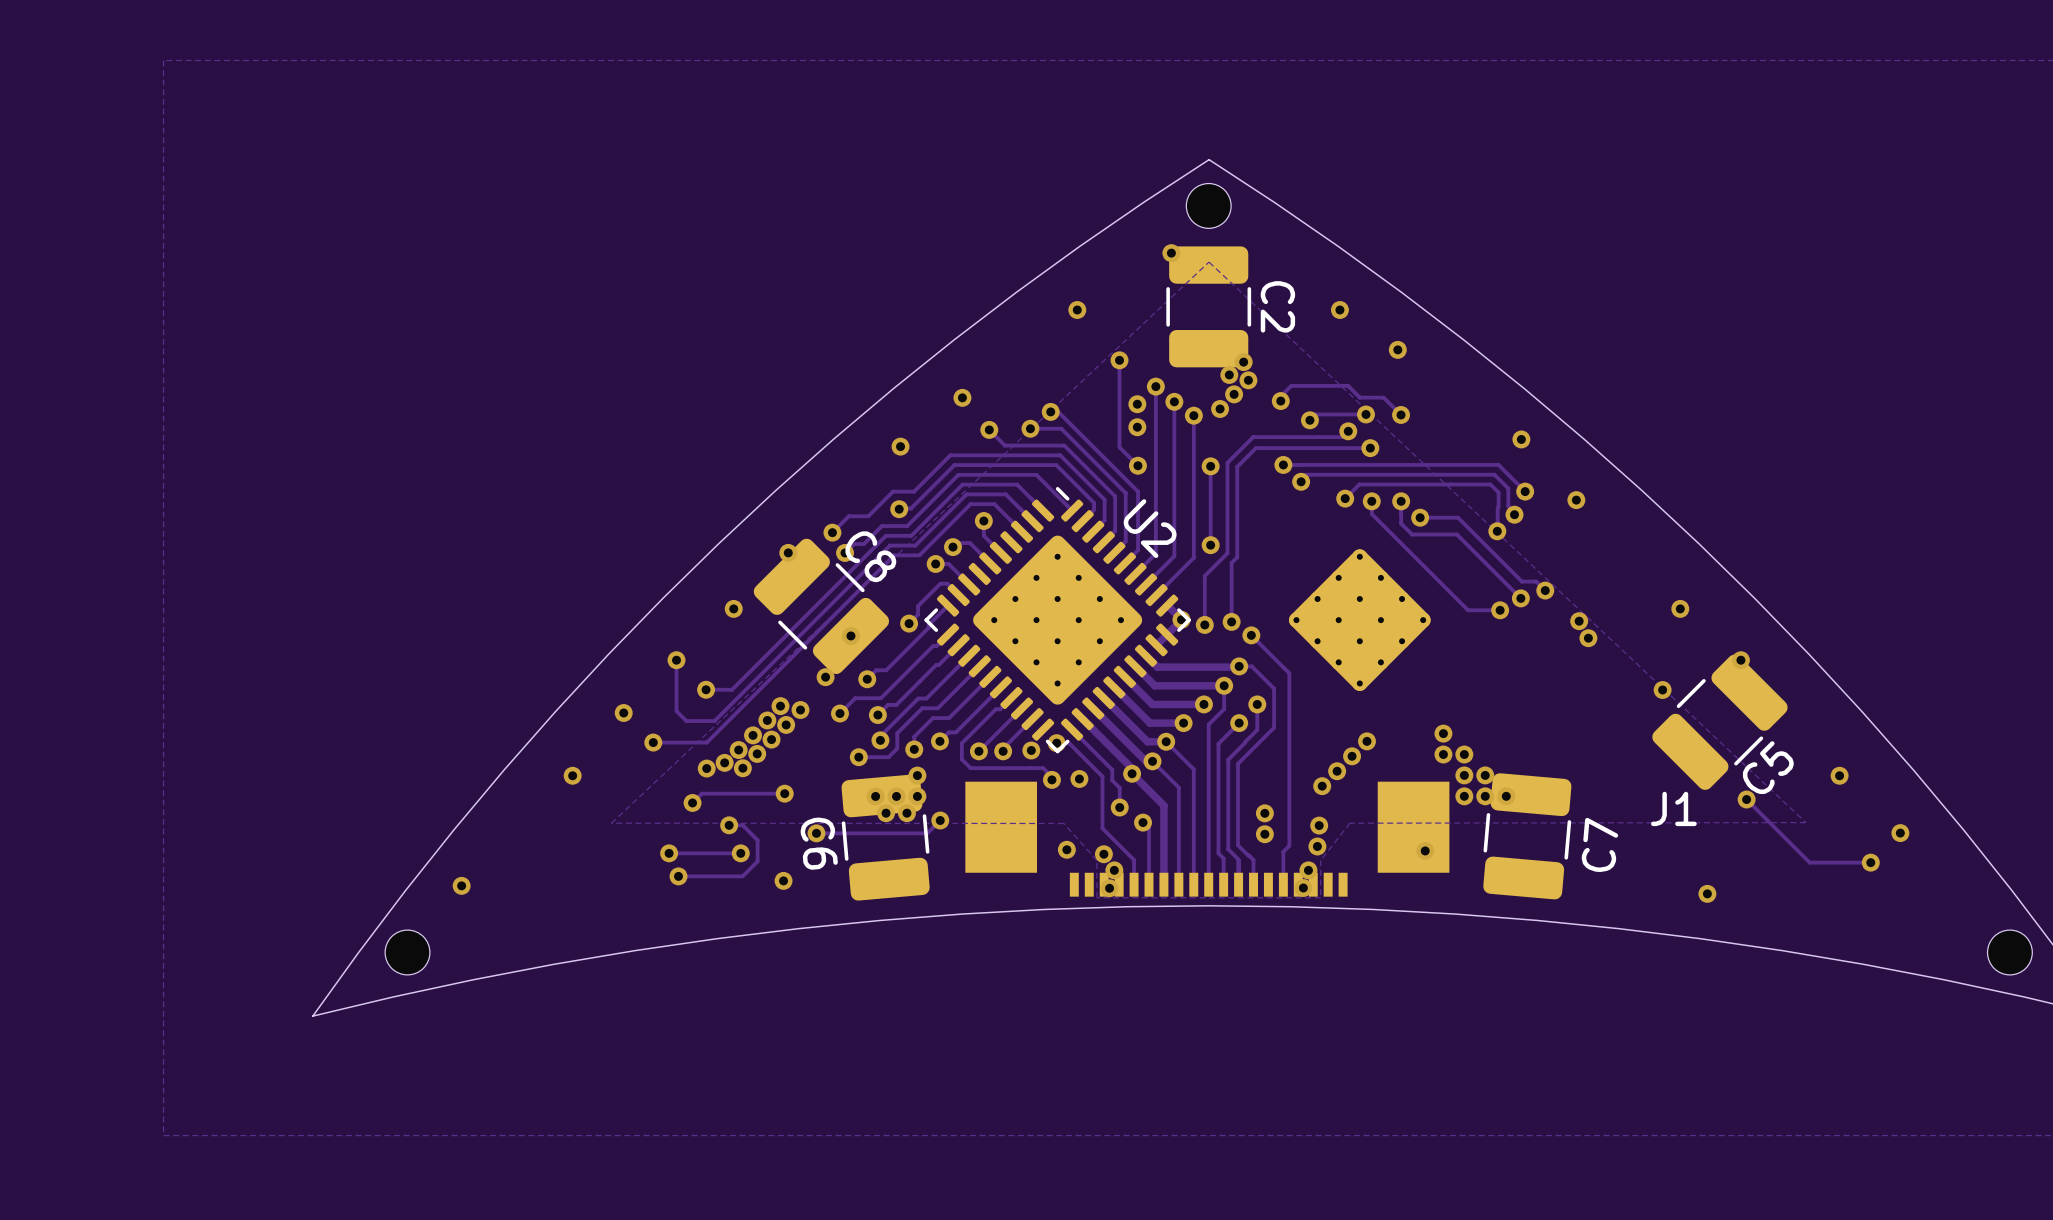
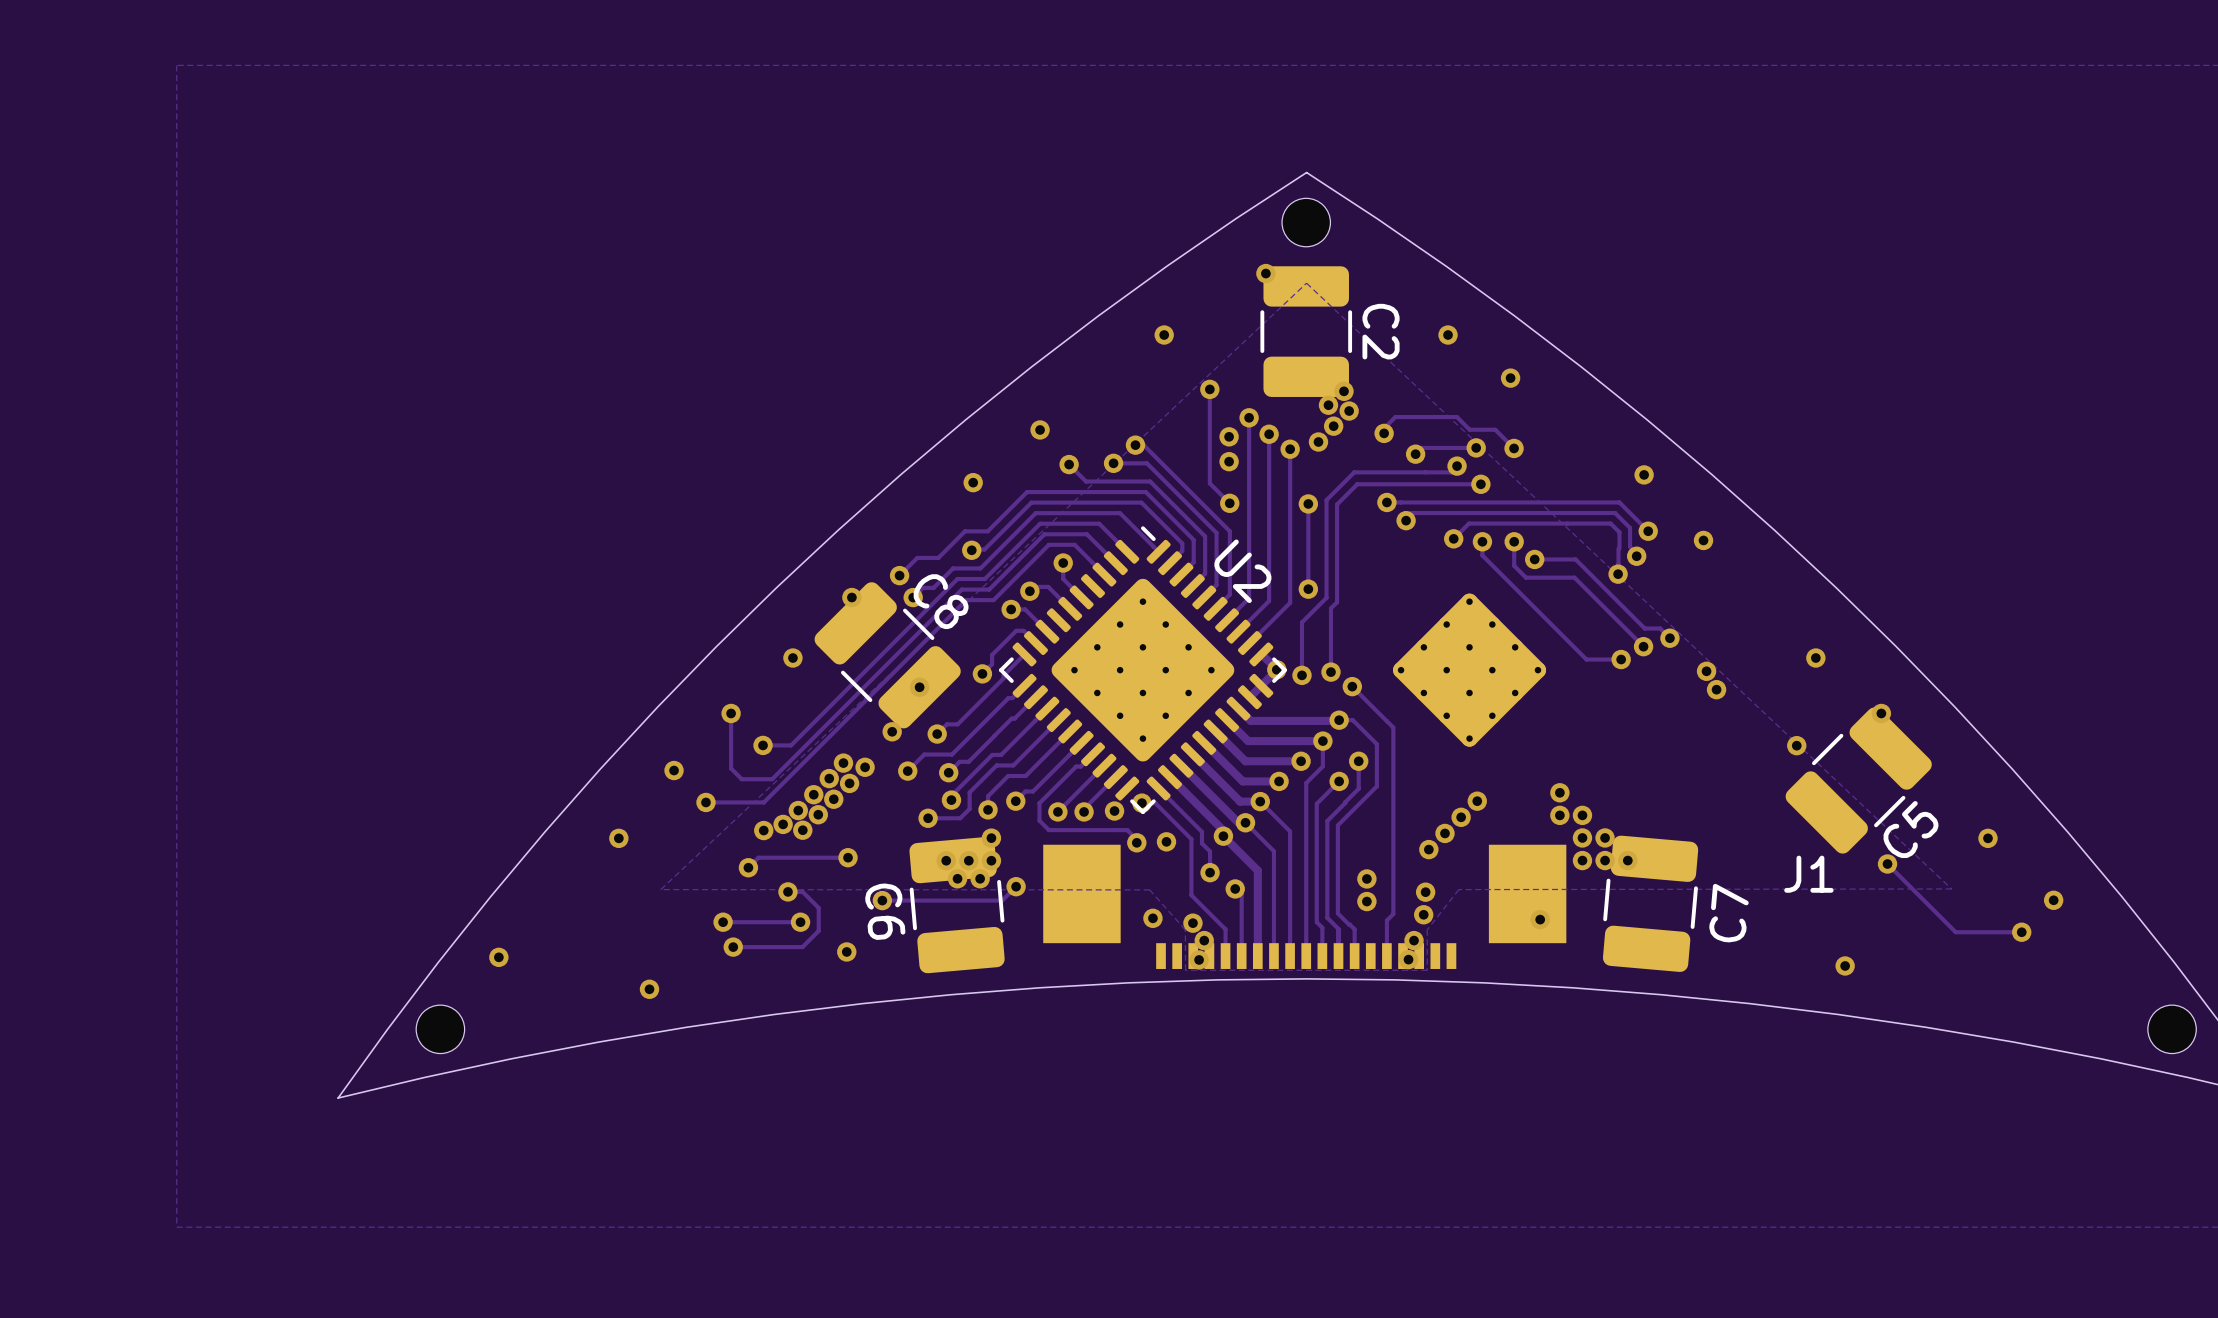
via: none -> (649, 989)

